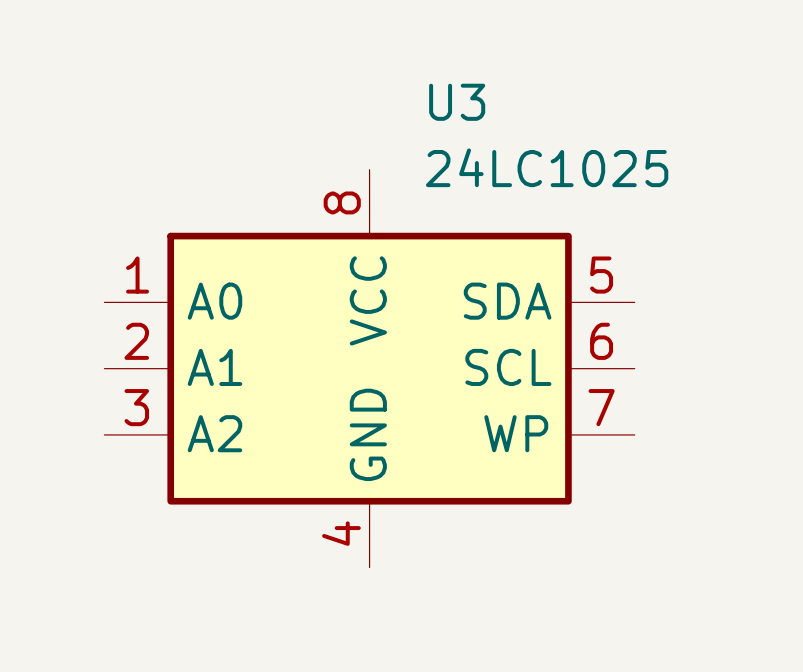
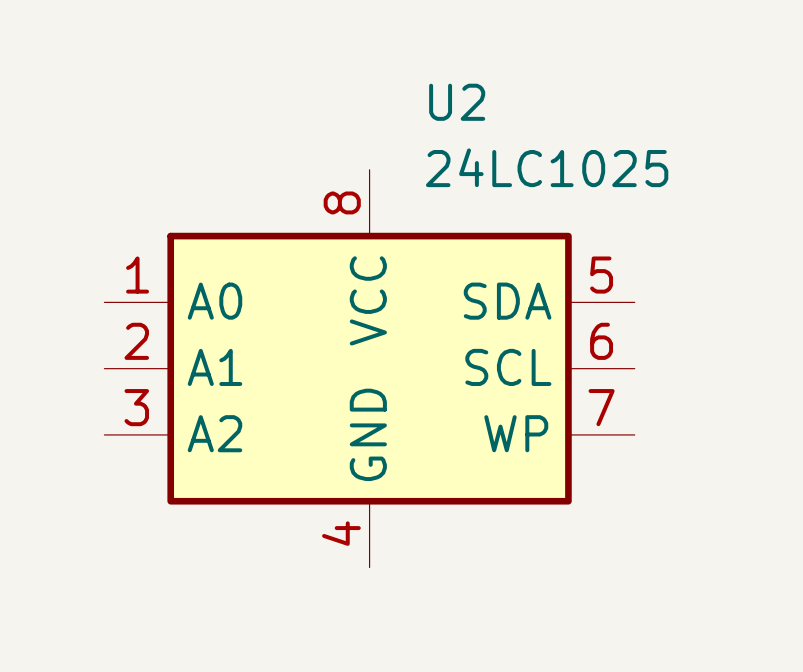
U3 name: U3 (457, 102) -> U2 (457, 102)

